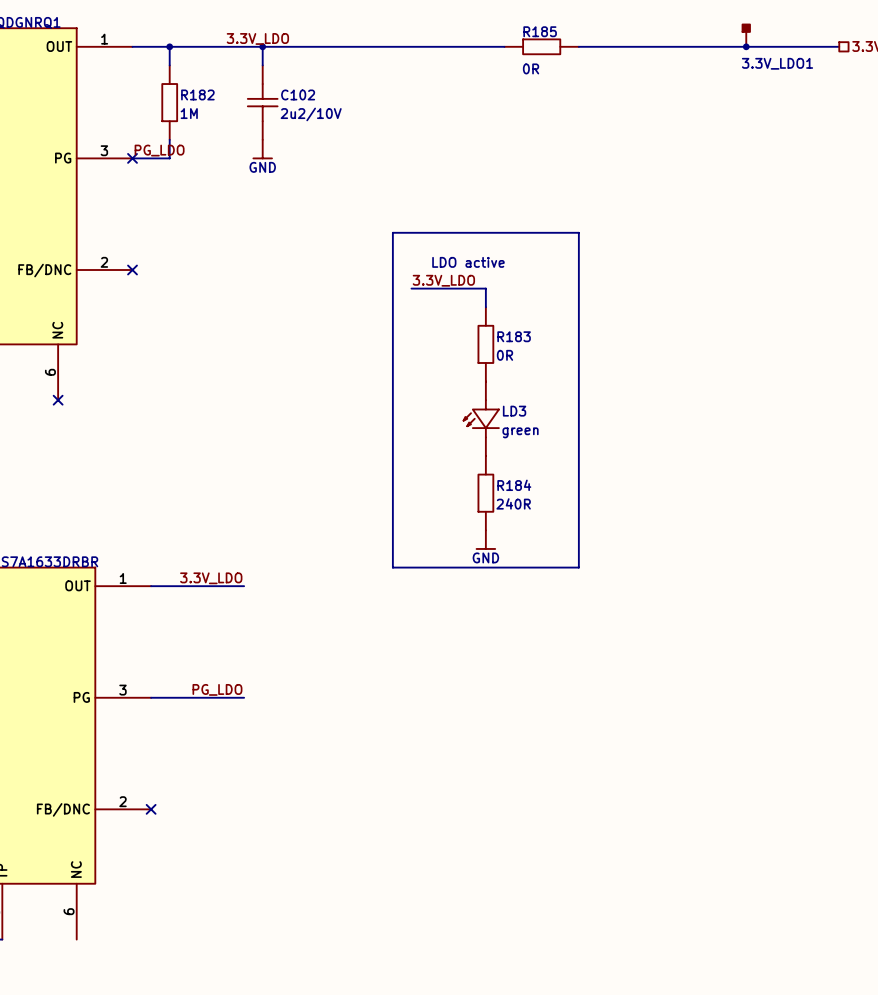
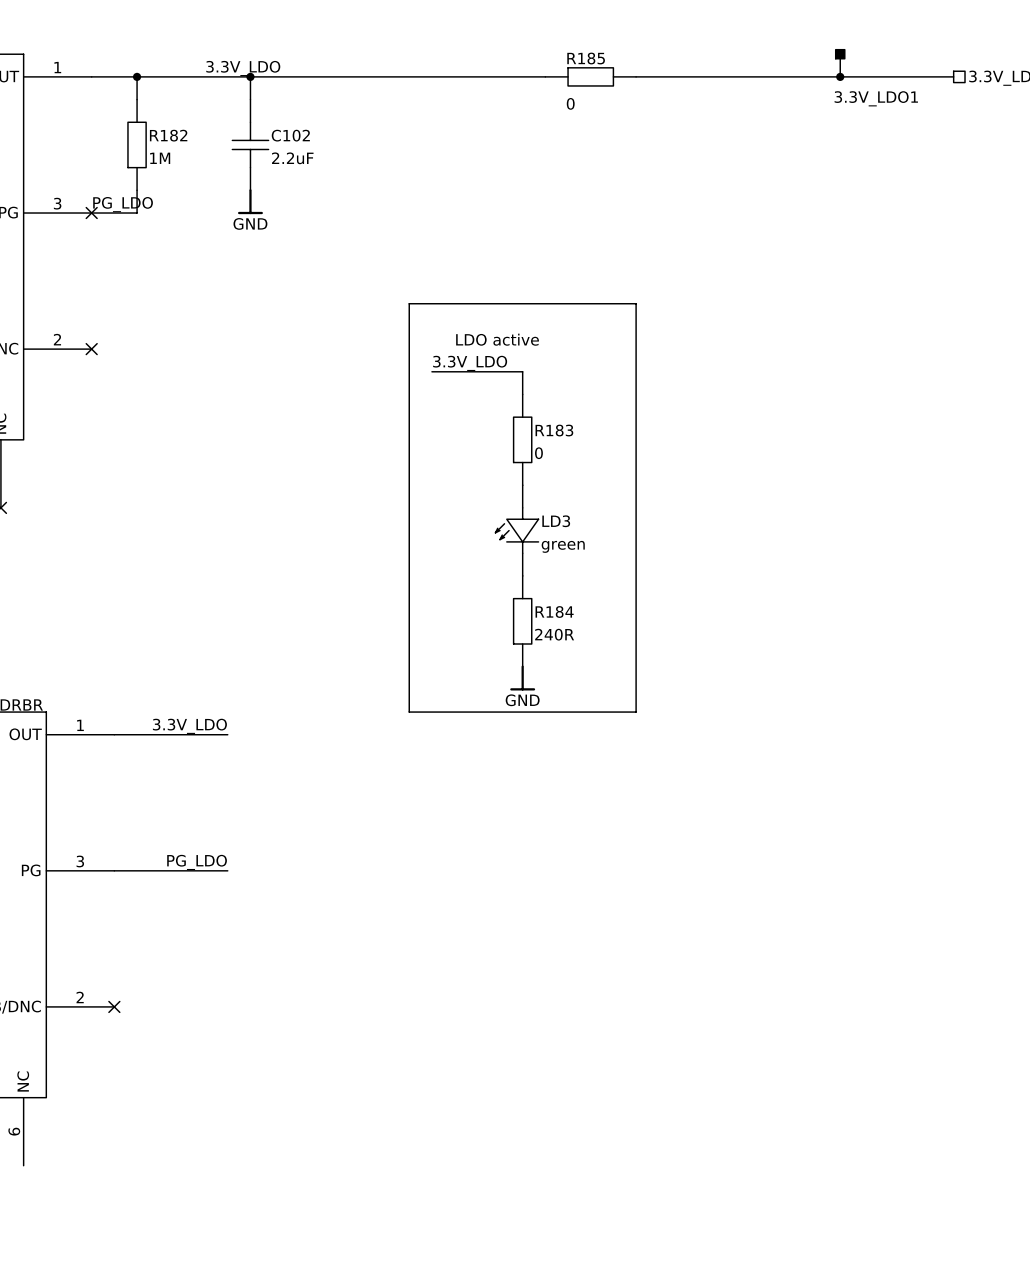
R185 value: 0R (531, 68) -> 0 (570, 103)
C102 value: 2u2/10V (311, 114) -> 2.2uF (292, 158)
R183 value: 0R (504, 355) -> 0 (538, 453)

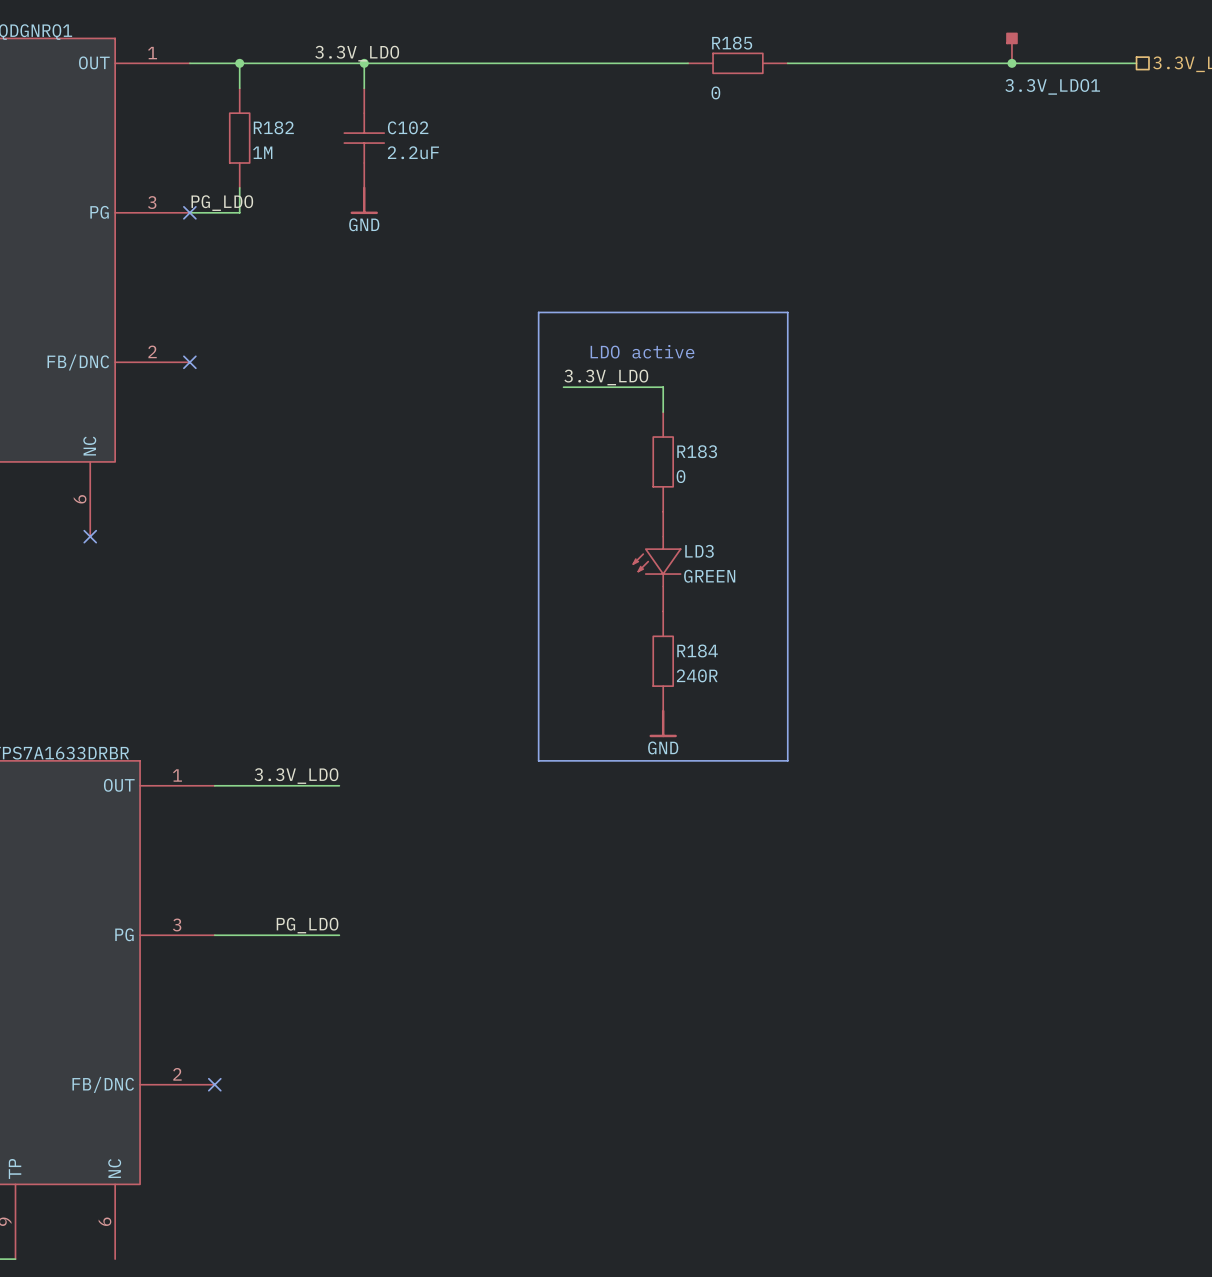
LD3 value: green (563, 546) -> GREEN (709, 576)

